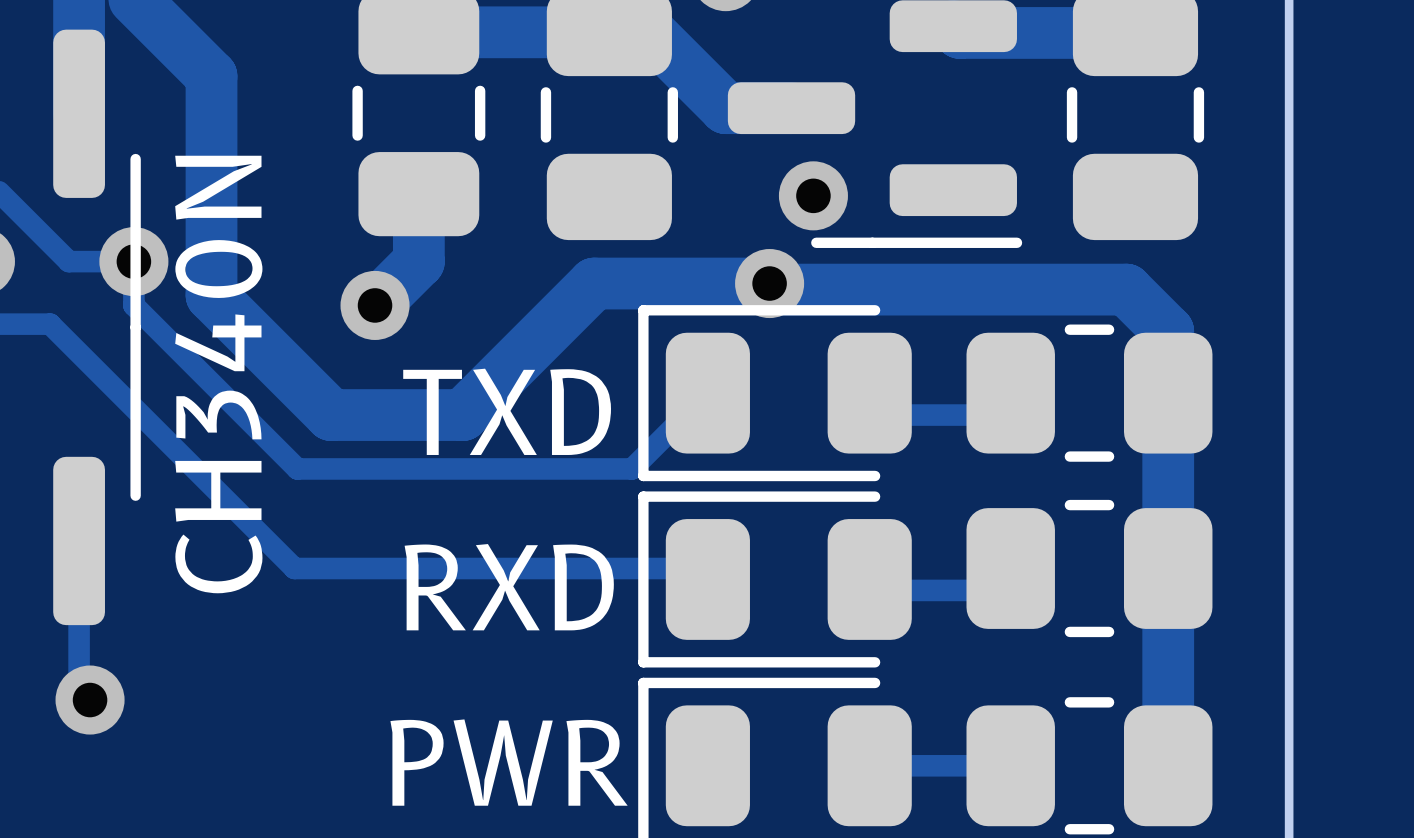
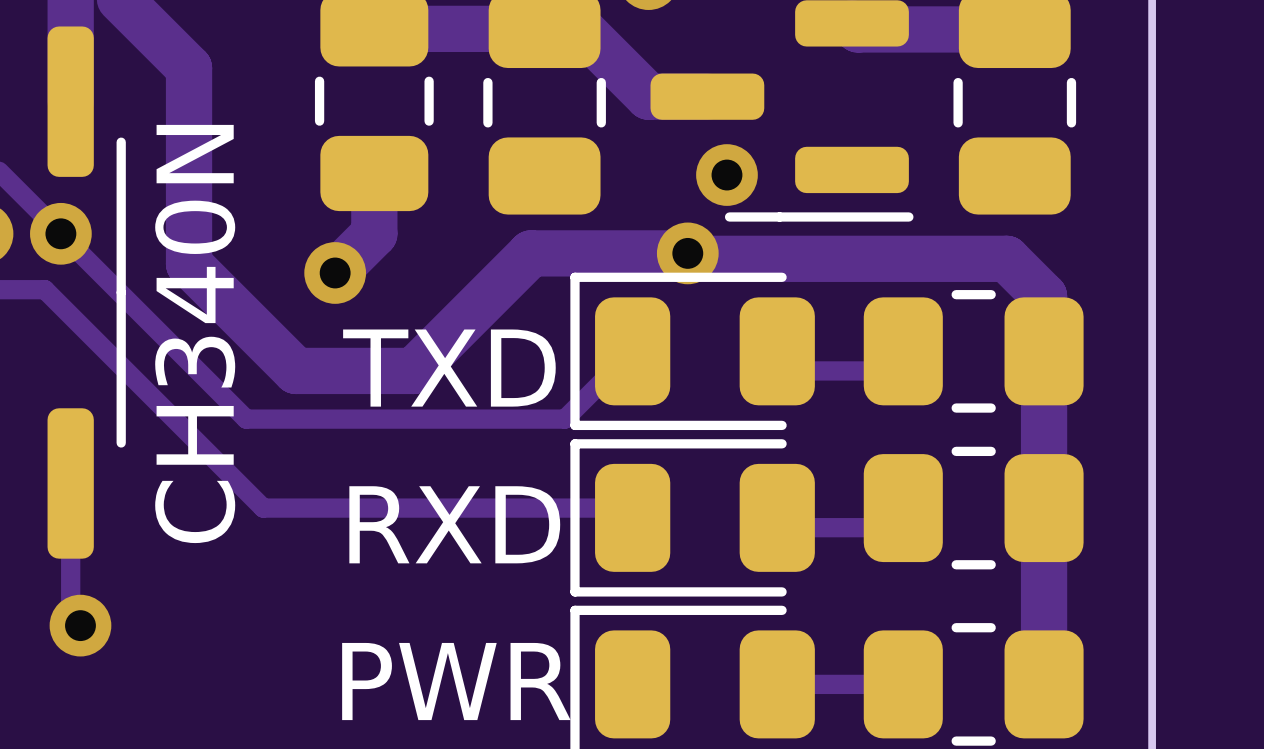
track: (68, 261) (133, 261) (133, 305) (297, 468) -> (60, 233) (246, 419) (265, 419)
via position: (133, 261) -> (60, 233)

